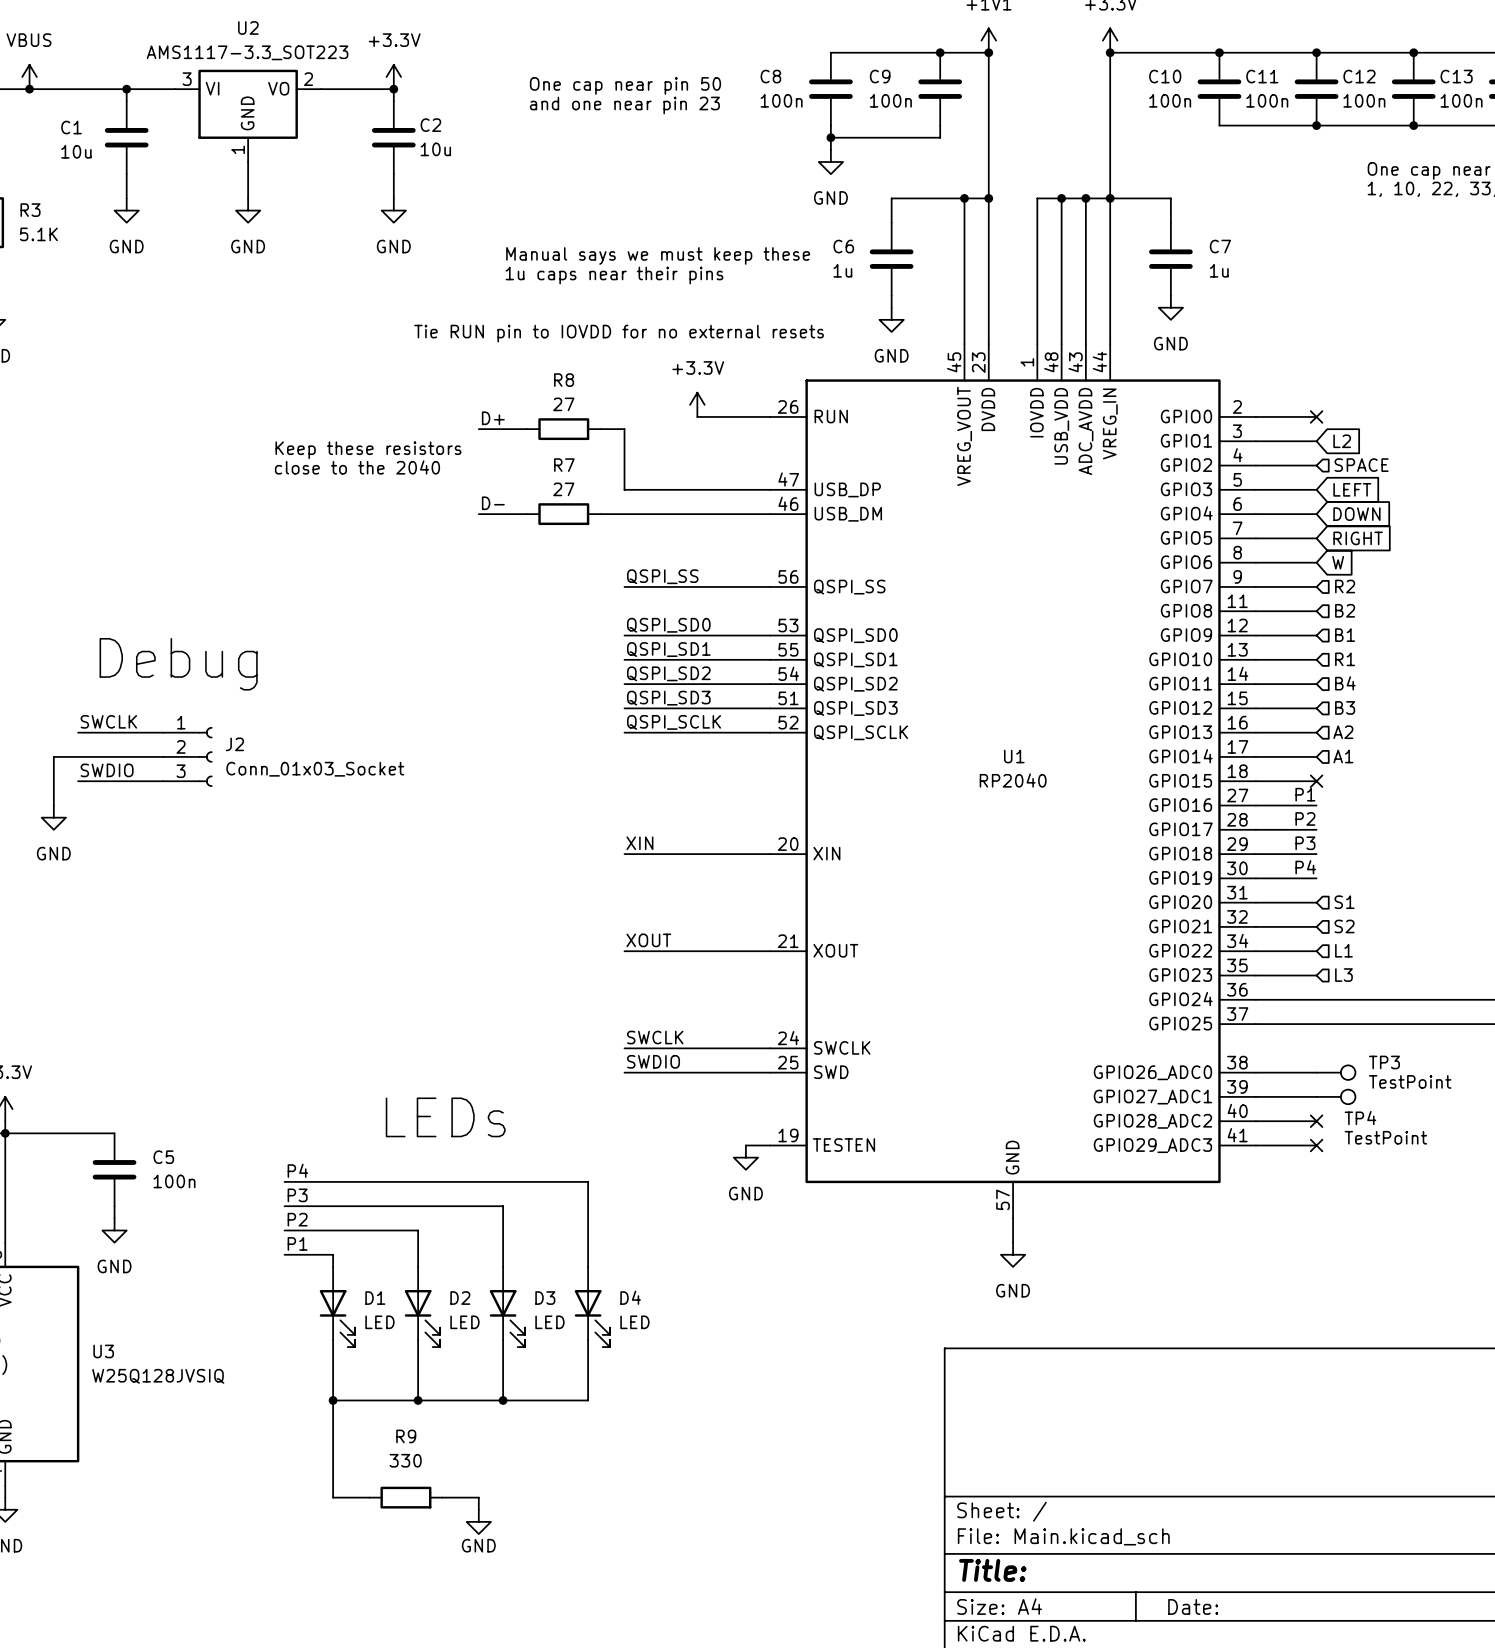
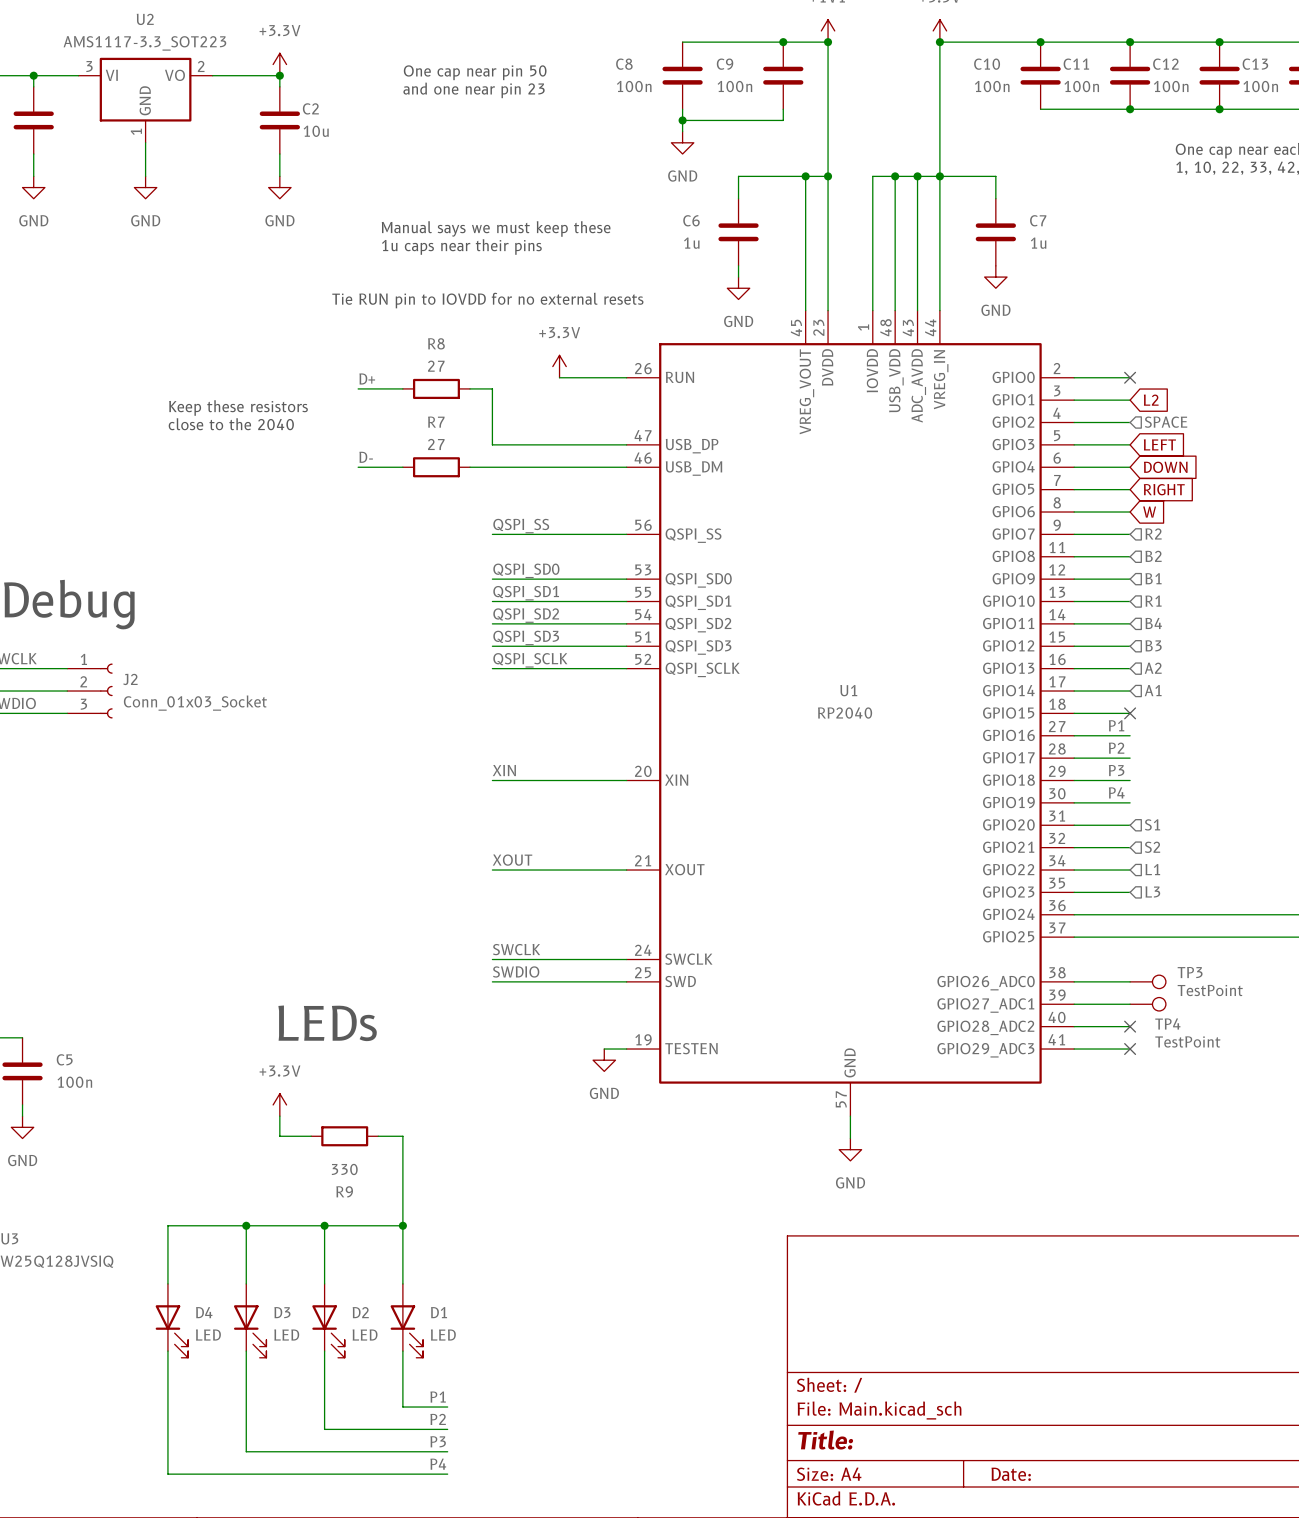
label: P4 (297, 1170) -> none
wire: (284, 1181) (588, 1181) (588, 1266) -> none
label: P3 (297, 1195) -> none
wire: (284, 1206) (503, 1206) (503, 1266) -> none
power symbol: none -> +3.3V (279, 1104)
wire: none -> (279, 1116) (279, 1136) (311, 1136)
label: P2 (297, 1219) -> none
wire: (284, 1230) (418, 1230) (418, 1266) -> none
wire: none -> (378, 1136) (402, 1136) (402, 1283)
label: P1 (297, 1243) -> none
wire: (284, 1254) (333, 1254) (333, 1266) -> none
D1 position: (337, 1306) -> (406, 1320)
D2 position: (422, 1306) -> (328, 1320)
D3 position: (507, 1306) -> (250, 1320)
D4 position: (592, 1306) -> (171, 1320)
wire: none -> (246, 1225) (246, 1283)
junction: none -> (246, 1225)
wire: none -> (324, 1225) (324, 1283)
junction: none -> (324, 1225)
wire: none -> (402, 1225) (167, 1225) (167, 1283)
junction: none -> (402, 1225)
wire: (333, 1339) (333, 1497) (369, 1497) -> none
wire: (418, 1339) (418, 1400) -> none
wire: (503, 1339) (503, 1400) -> none
wire: (588, 1339) (588, 1400) (333, 1400) -> none
junction: (333, 1400) -> none
junction: (418, 1400) -> none
junction: (503, 1400) -> none
R9 name position: R9 (406, 1436) -> R9 (344, 1191)
R9 value position: 330 (405, 1460) -> 330 (344, 1169)
wire: none -> (167, 1351) (167, 1474) (447, 1474)
wire: none -> (246, 1351) (246, 1451) (447, 1451)
wire: none -> (324, 1351) (324, 1429) (447, 1429)
wire: none -> (402, 1351) (402, 1407) (447, 1407)
R9 position: (405, 1497) -> (344, 1136)
wire: (442, 1497) (478, 1497) (478, 1509) -> none
power symbol: GND (478, 1521) -> none
label: none -> P1 (438, 1397)
label: none -> P2 (438, 1419)
label: none -> P3 (438, 1441)
label: none -> P4 (438, 1464)

